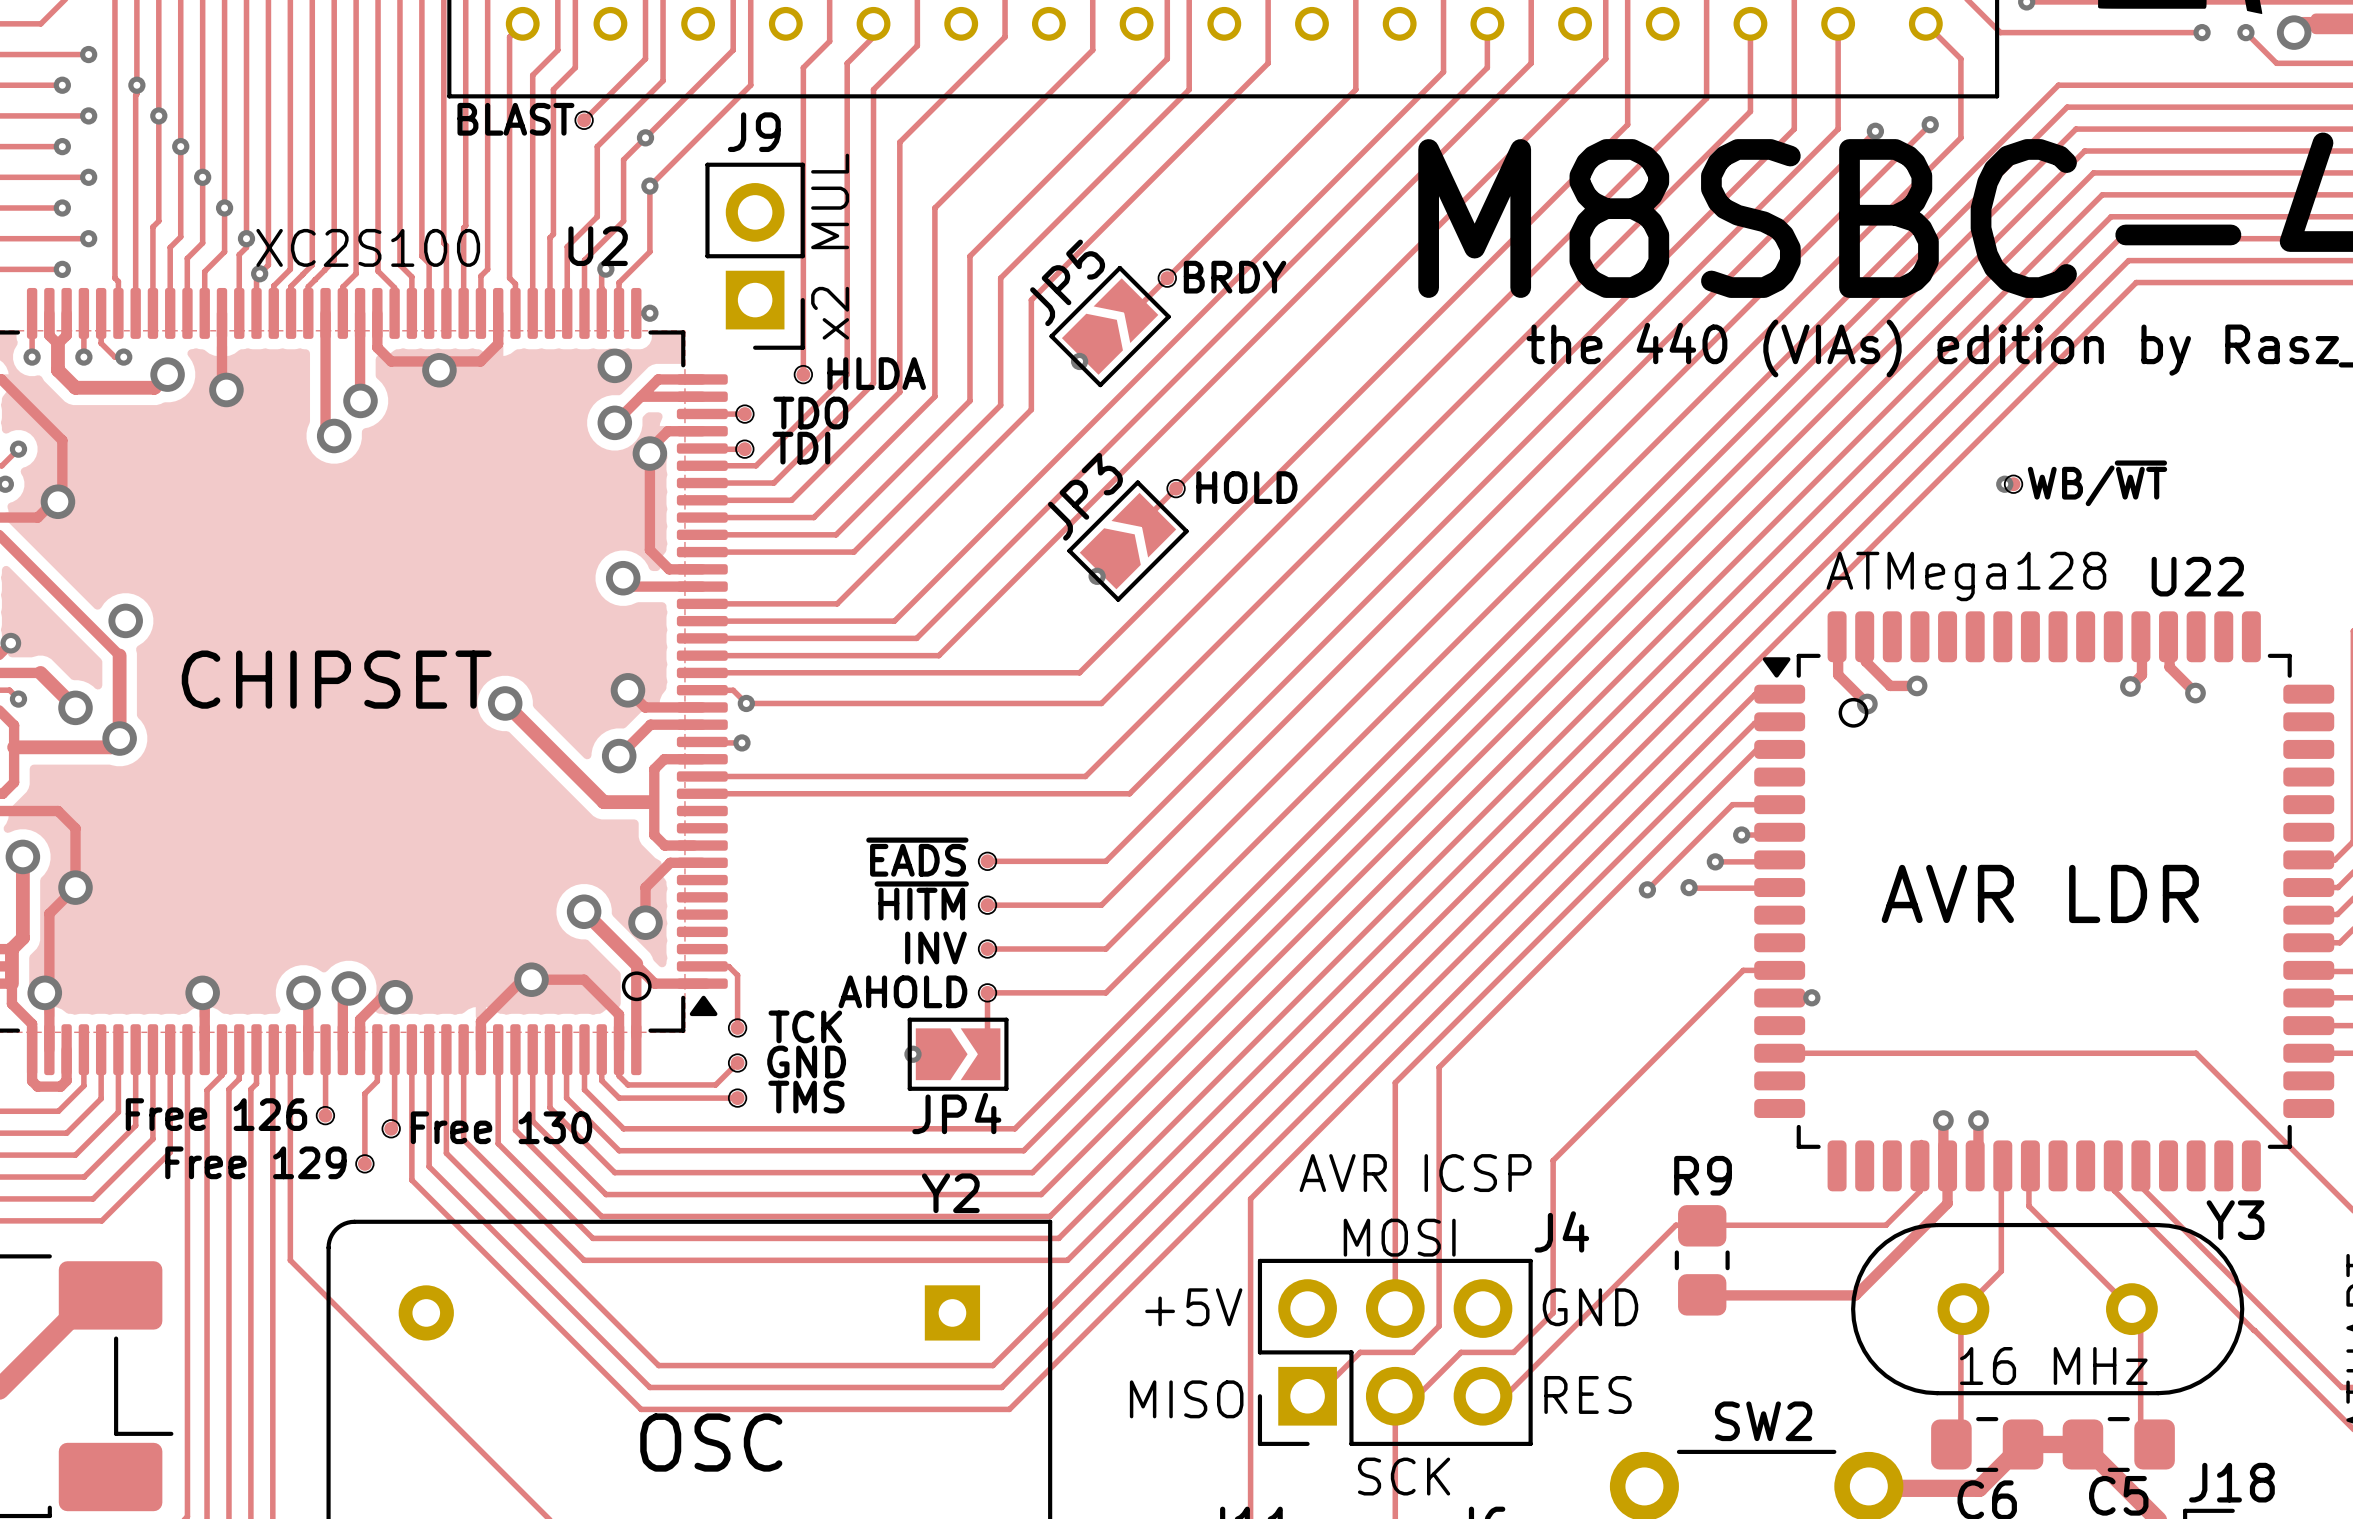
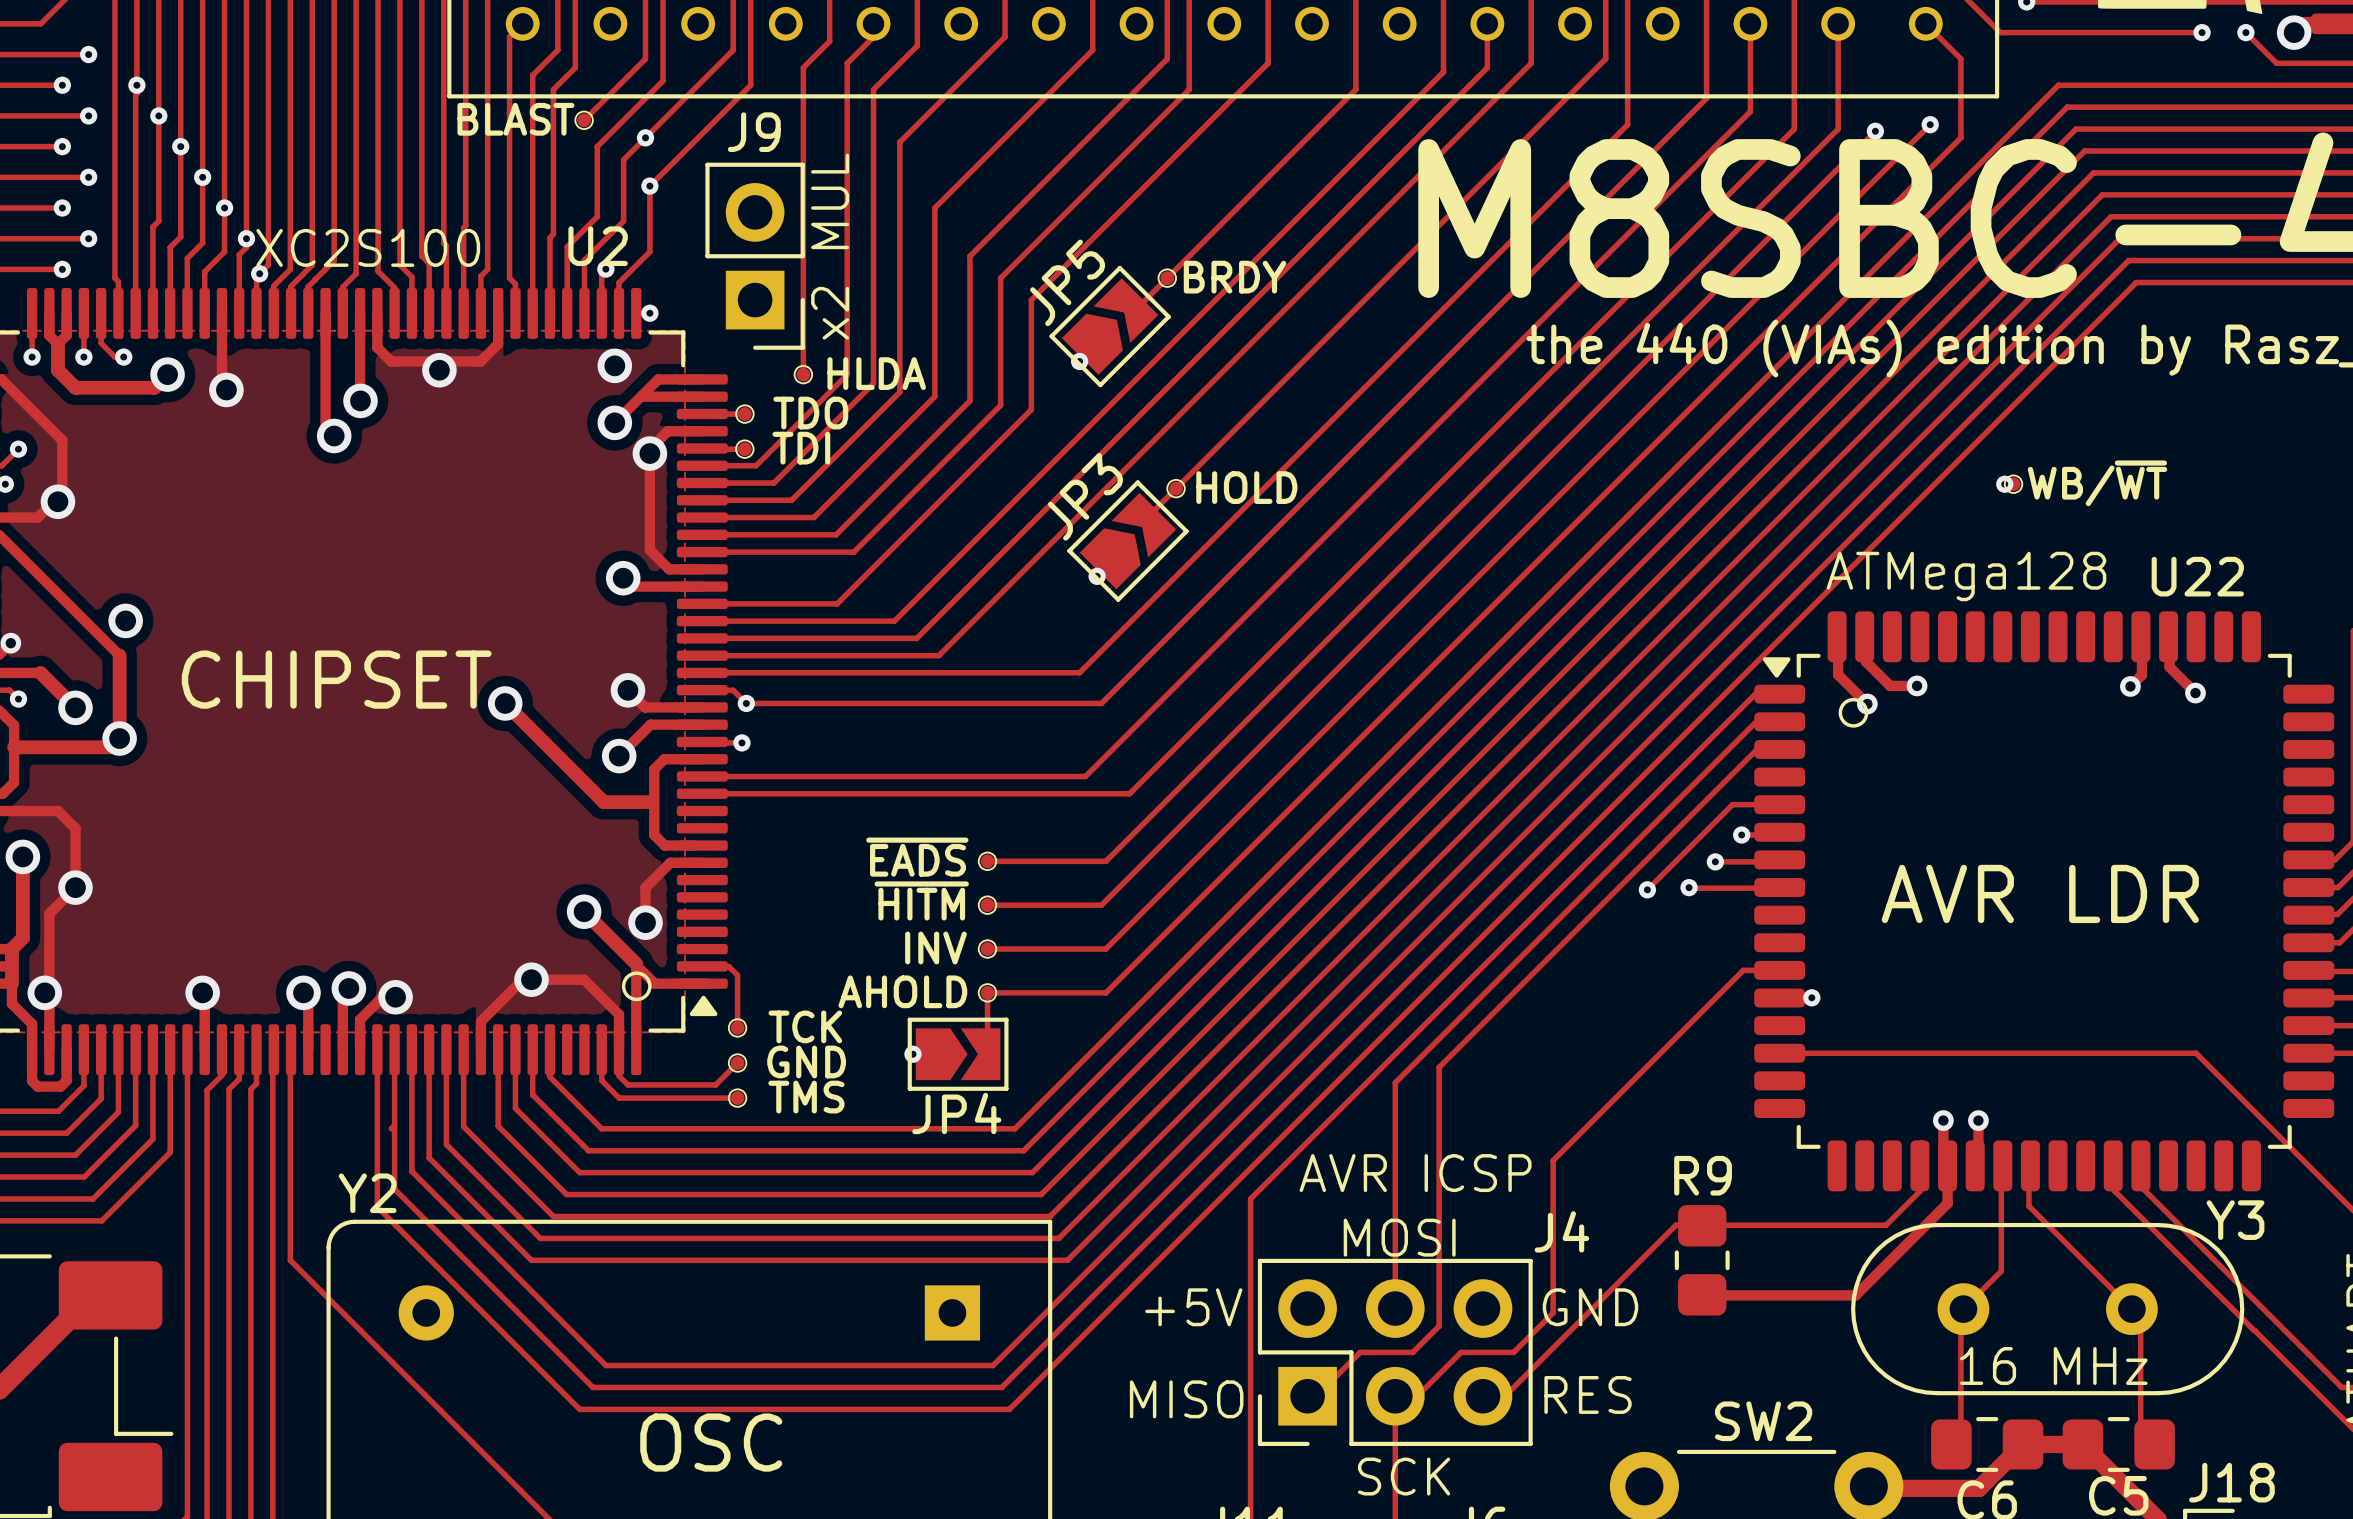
track: (325, 1049) (325, 1115) -> none
track: (584, 1049) (584, 1089) (623, 1128) -> (549, 1077) (601, 1128) (623, 1128)
track: (566, 1050) (566, 1098) (619, 1150) -> none
track: (549, 1077) (549, 1107) (614, 1172) -> none
track: (377, 1081) (364, 1093) (364, 1163) -> none
track: (532, 1094) (532, 1121) (606, 1194) -> (532, 1094) (588, 1150) (619, 1150)
track: (515, 1108) (515, 1130) (601, 1216) -> (515, 1108) (579, 1172) (614, 1172)
part: Free 126 (325, 1115) -> none
track: (463, 1126) (463, 1139) (584, 1260) -> (429, 1157) (531, 1260) (584, 1260)
track: none -> (463, 1126) (553, 1216) (601, 1216)
track: (498, 1126) (498, 1143) (592, 1238) -> (498, 1126) (566, 1194) (606, 1194)
part: Free 130 (391, 1128) -> none
track: (446, 1144) (446, 1153) (658, 1365) -> (411, 1171) (606, 1365) (658, 1365)
track: none -> (446, 1144) (540, 1238) (592, 1238)
track: (429, 1157) (429, 1166) (649, 1387) -> (394, 1125) (394, 1189) (592, 1387) (649, 1387)
part: Free 129 (364, 1163) -> none
track: (411, 1171) (411, 1180) (641, 1409) -> (377, 1081) (377, 1207) (579, 1409) (641, 1409)
Y2 name position: Y2 (950, 1193) -> Y2 (367, 1193)

